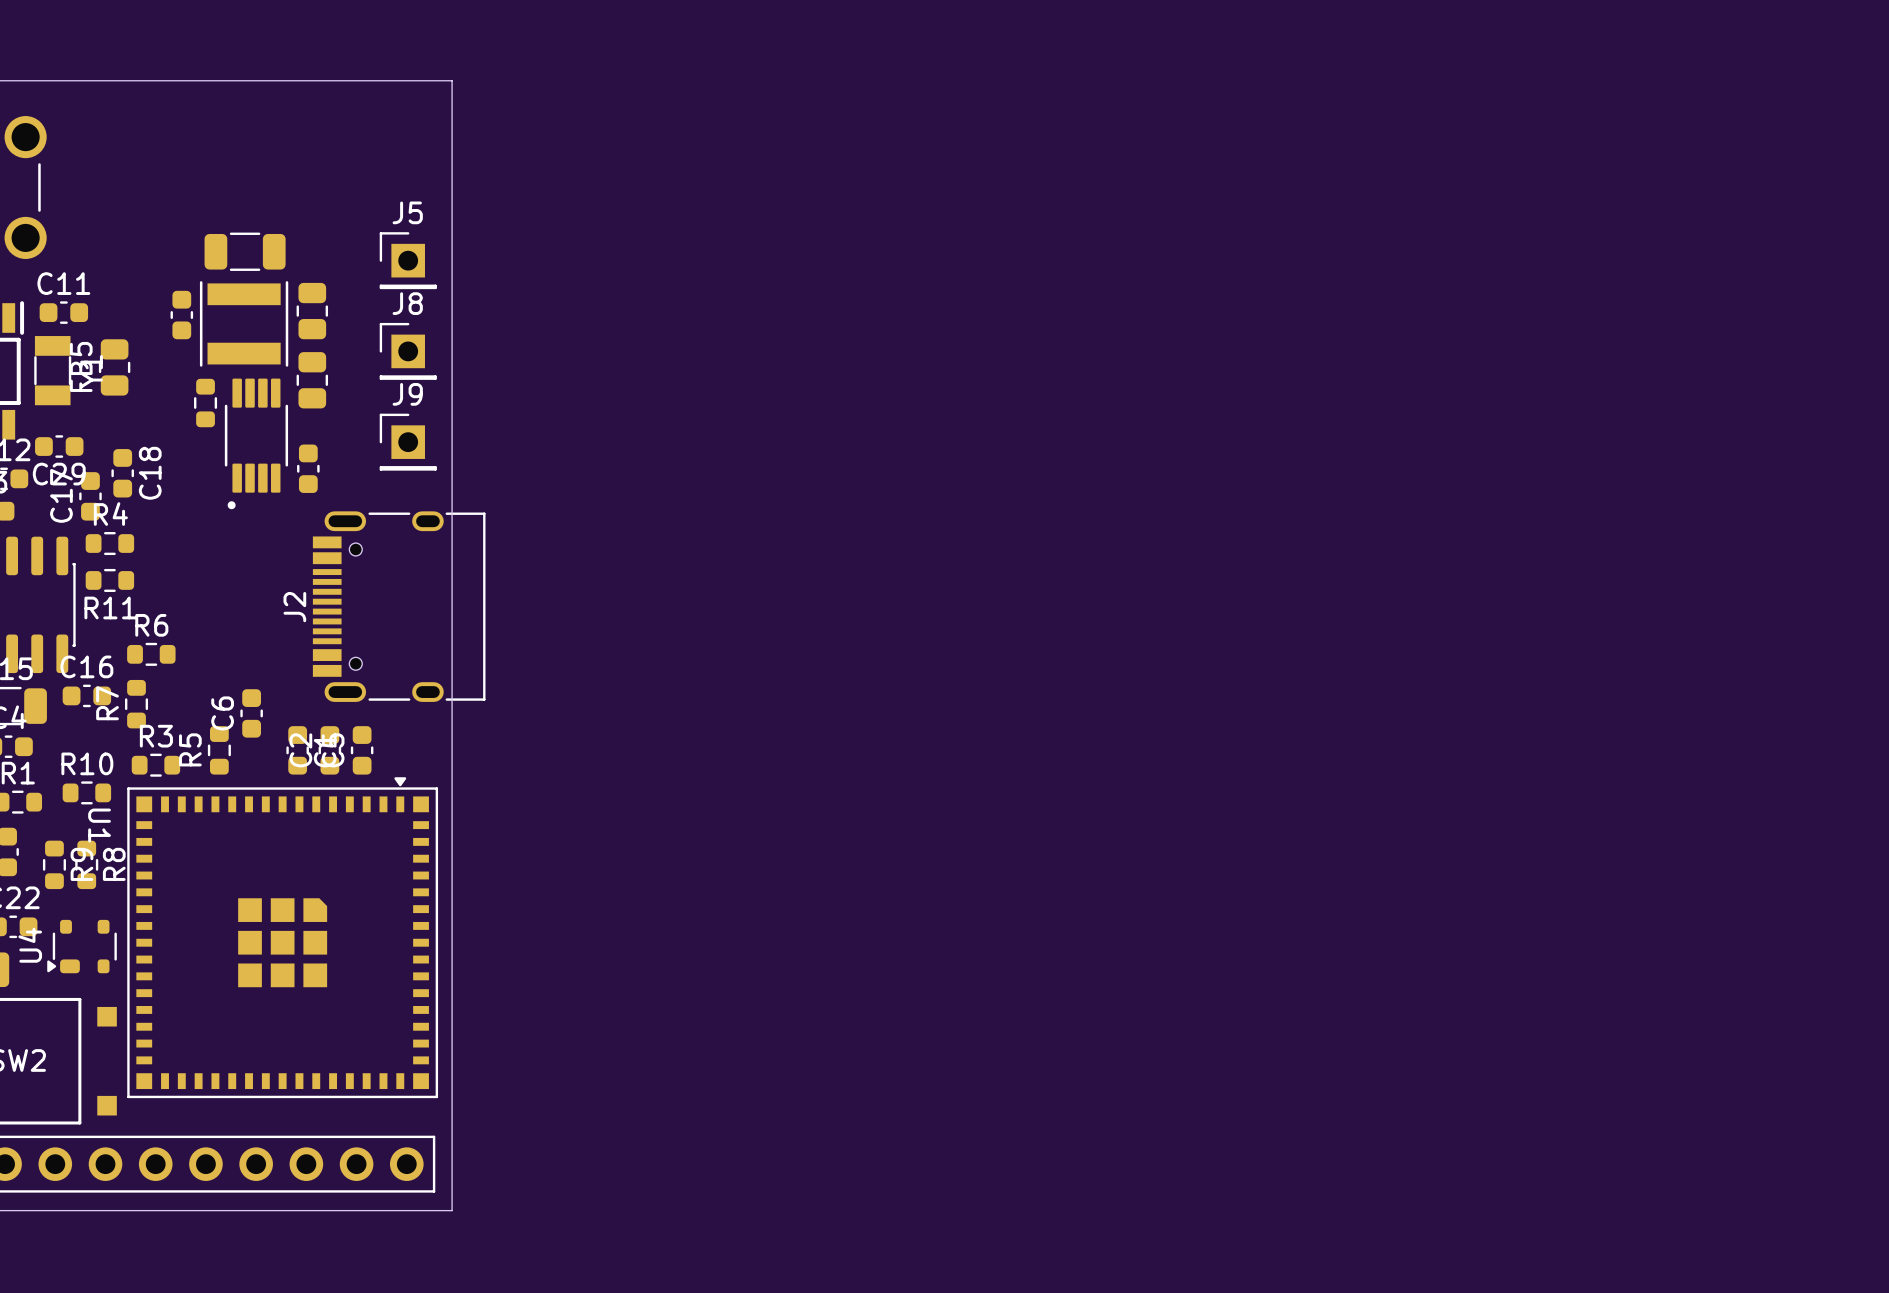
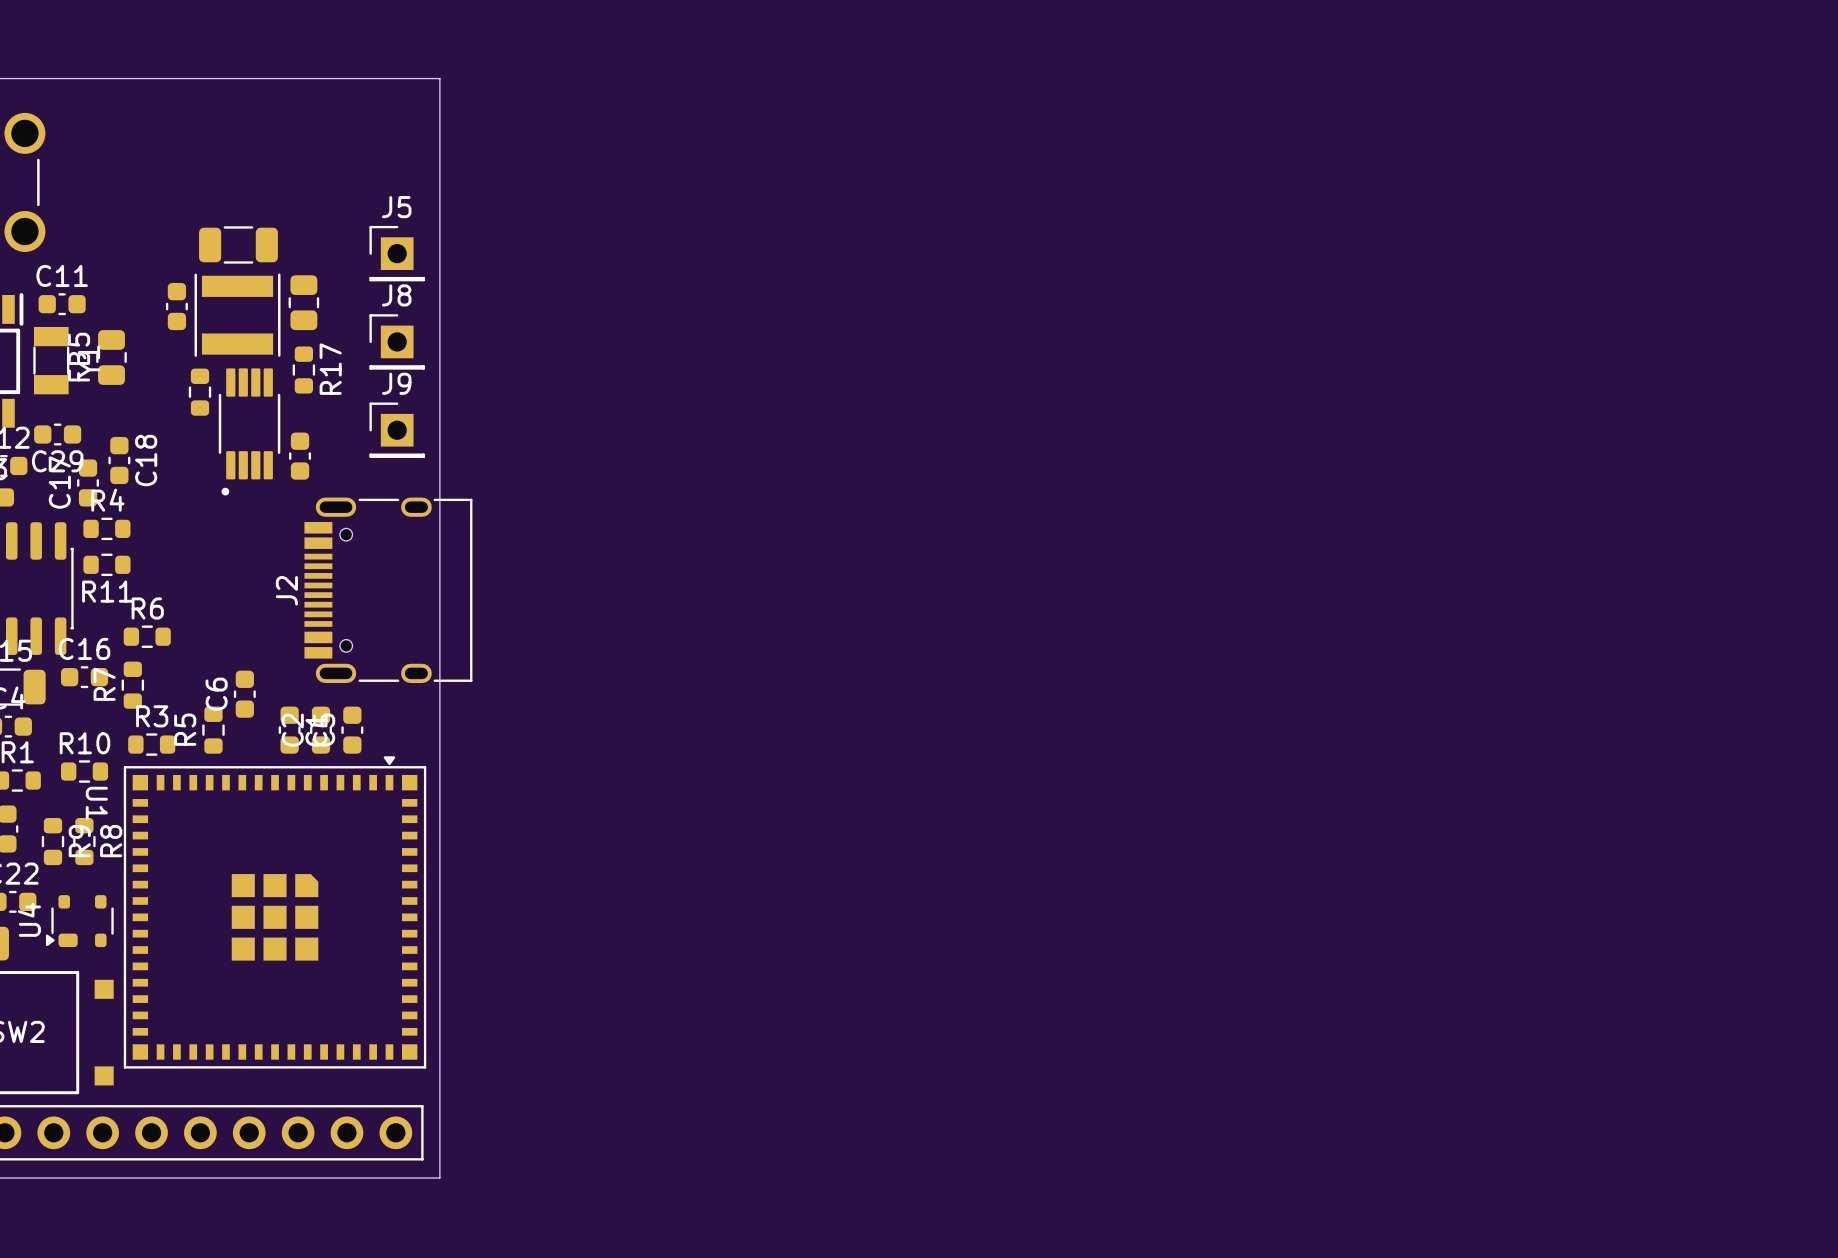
part: (312, 380) -> none
R17: none -> (303, 370)

